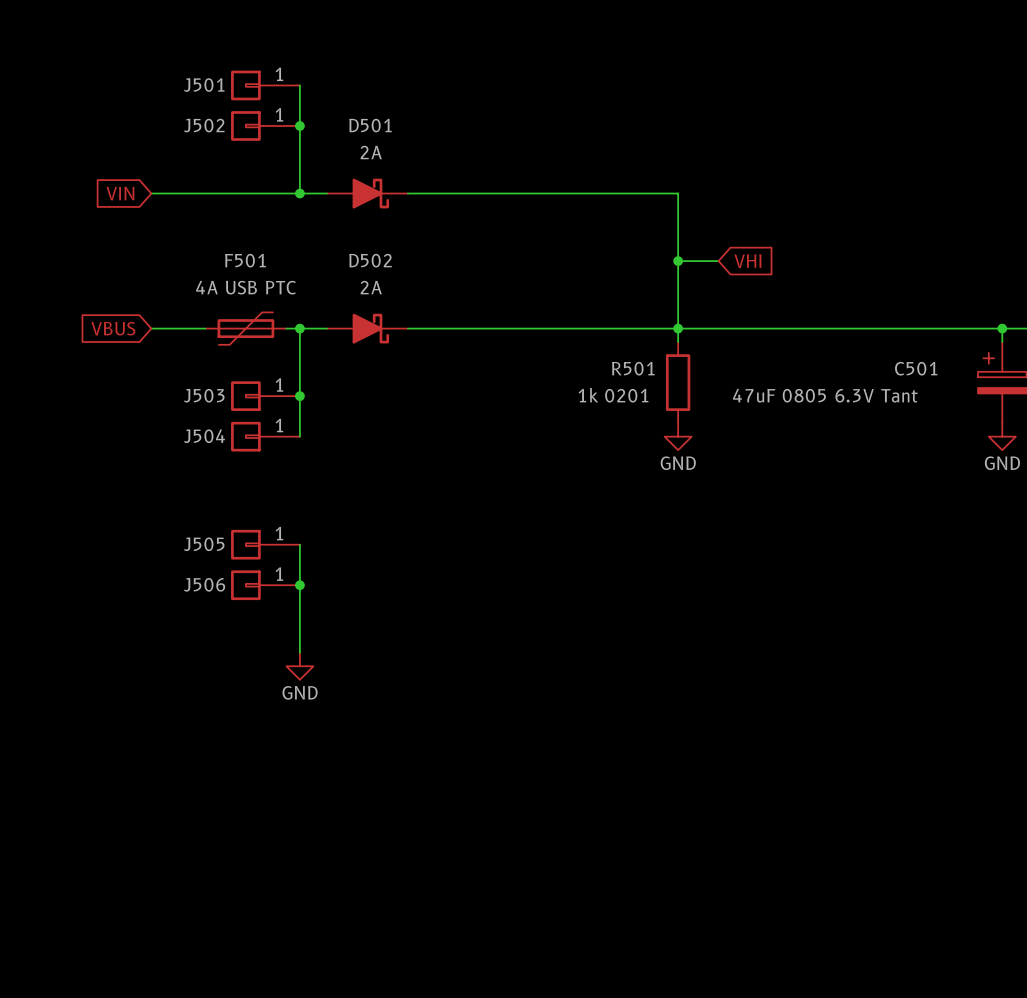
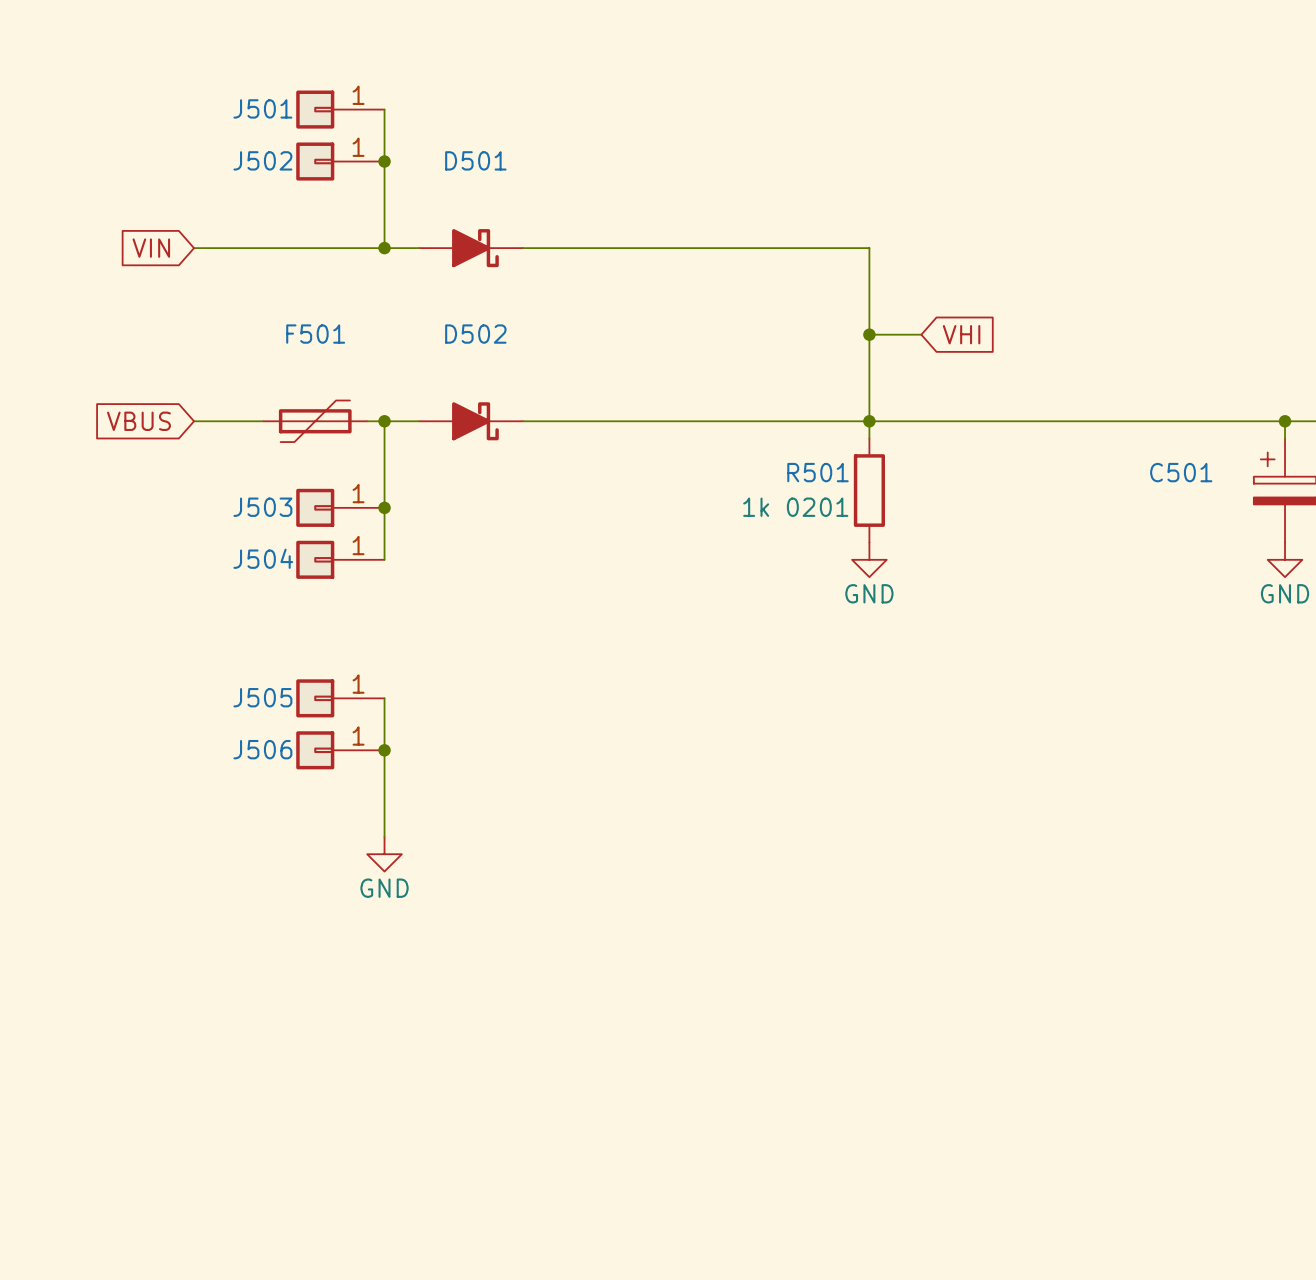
D501 value: 2A (371, 152) -> none
F501 value: 4A USB PTC (246, 287) -> none
D502 value: 2A (371, 287) -> none
C501 value: 47uF 0805 6.3V Tant (825, 395) -> none

